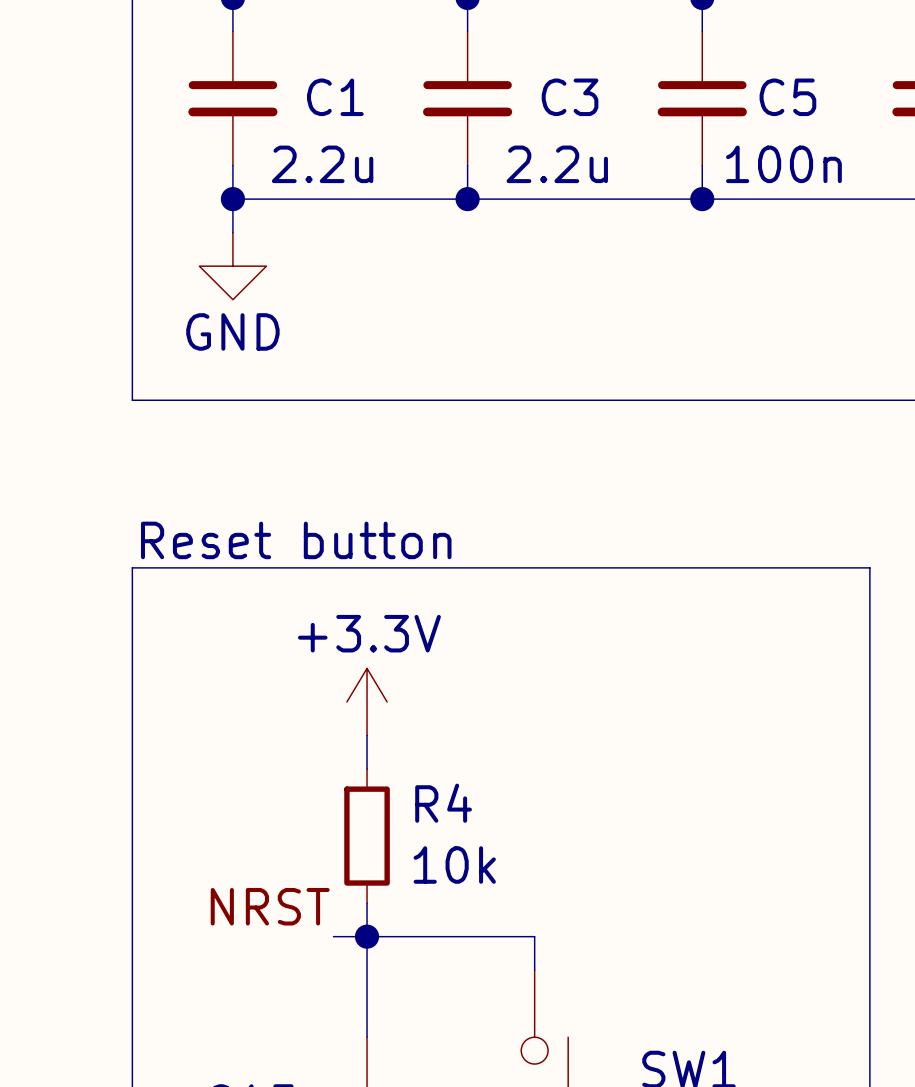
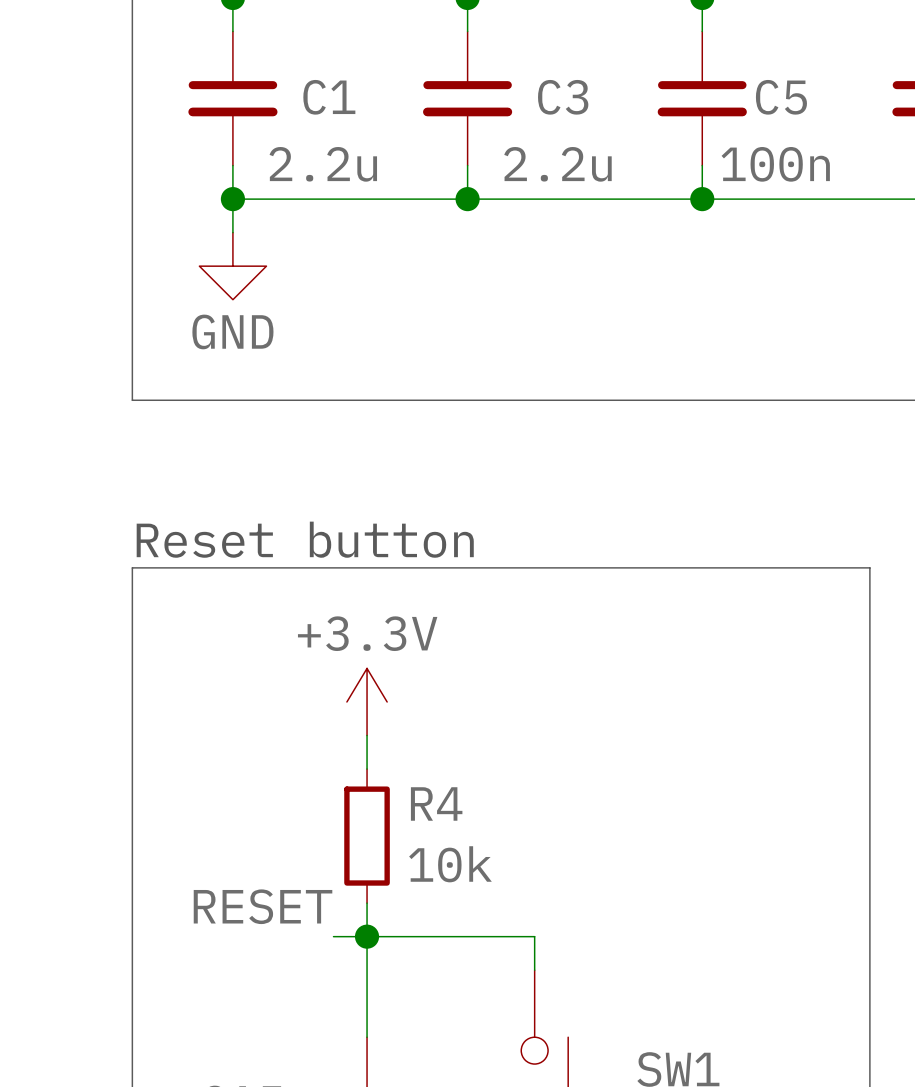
label: NRST (270, 906) -> RESET (263, 906)

